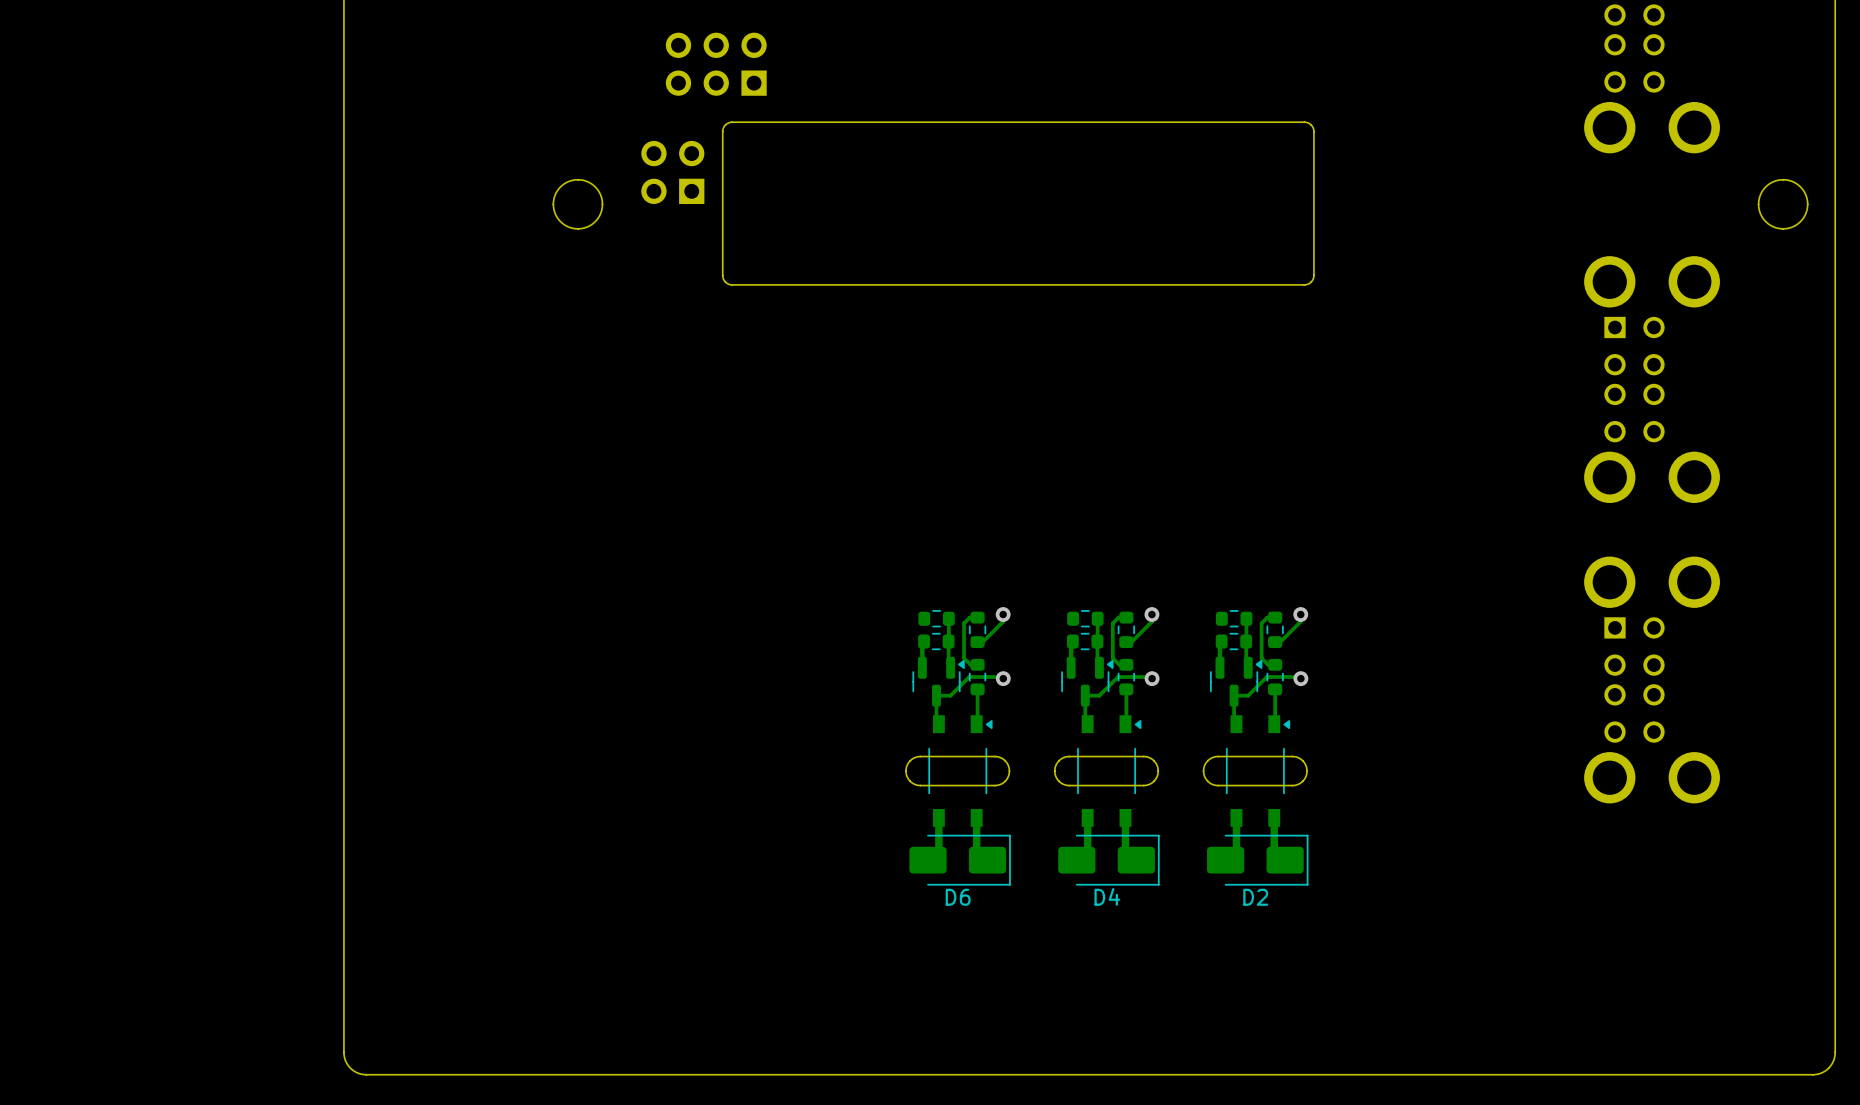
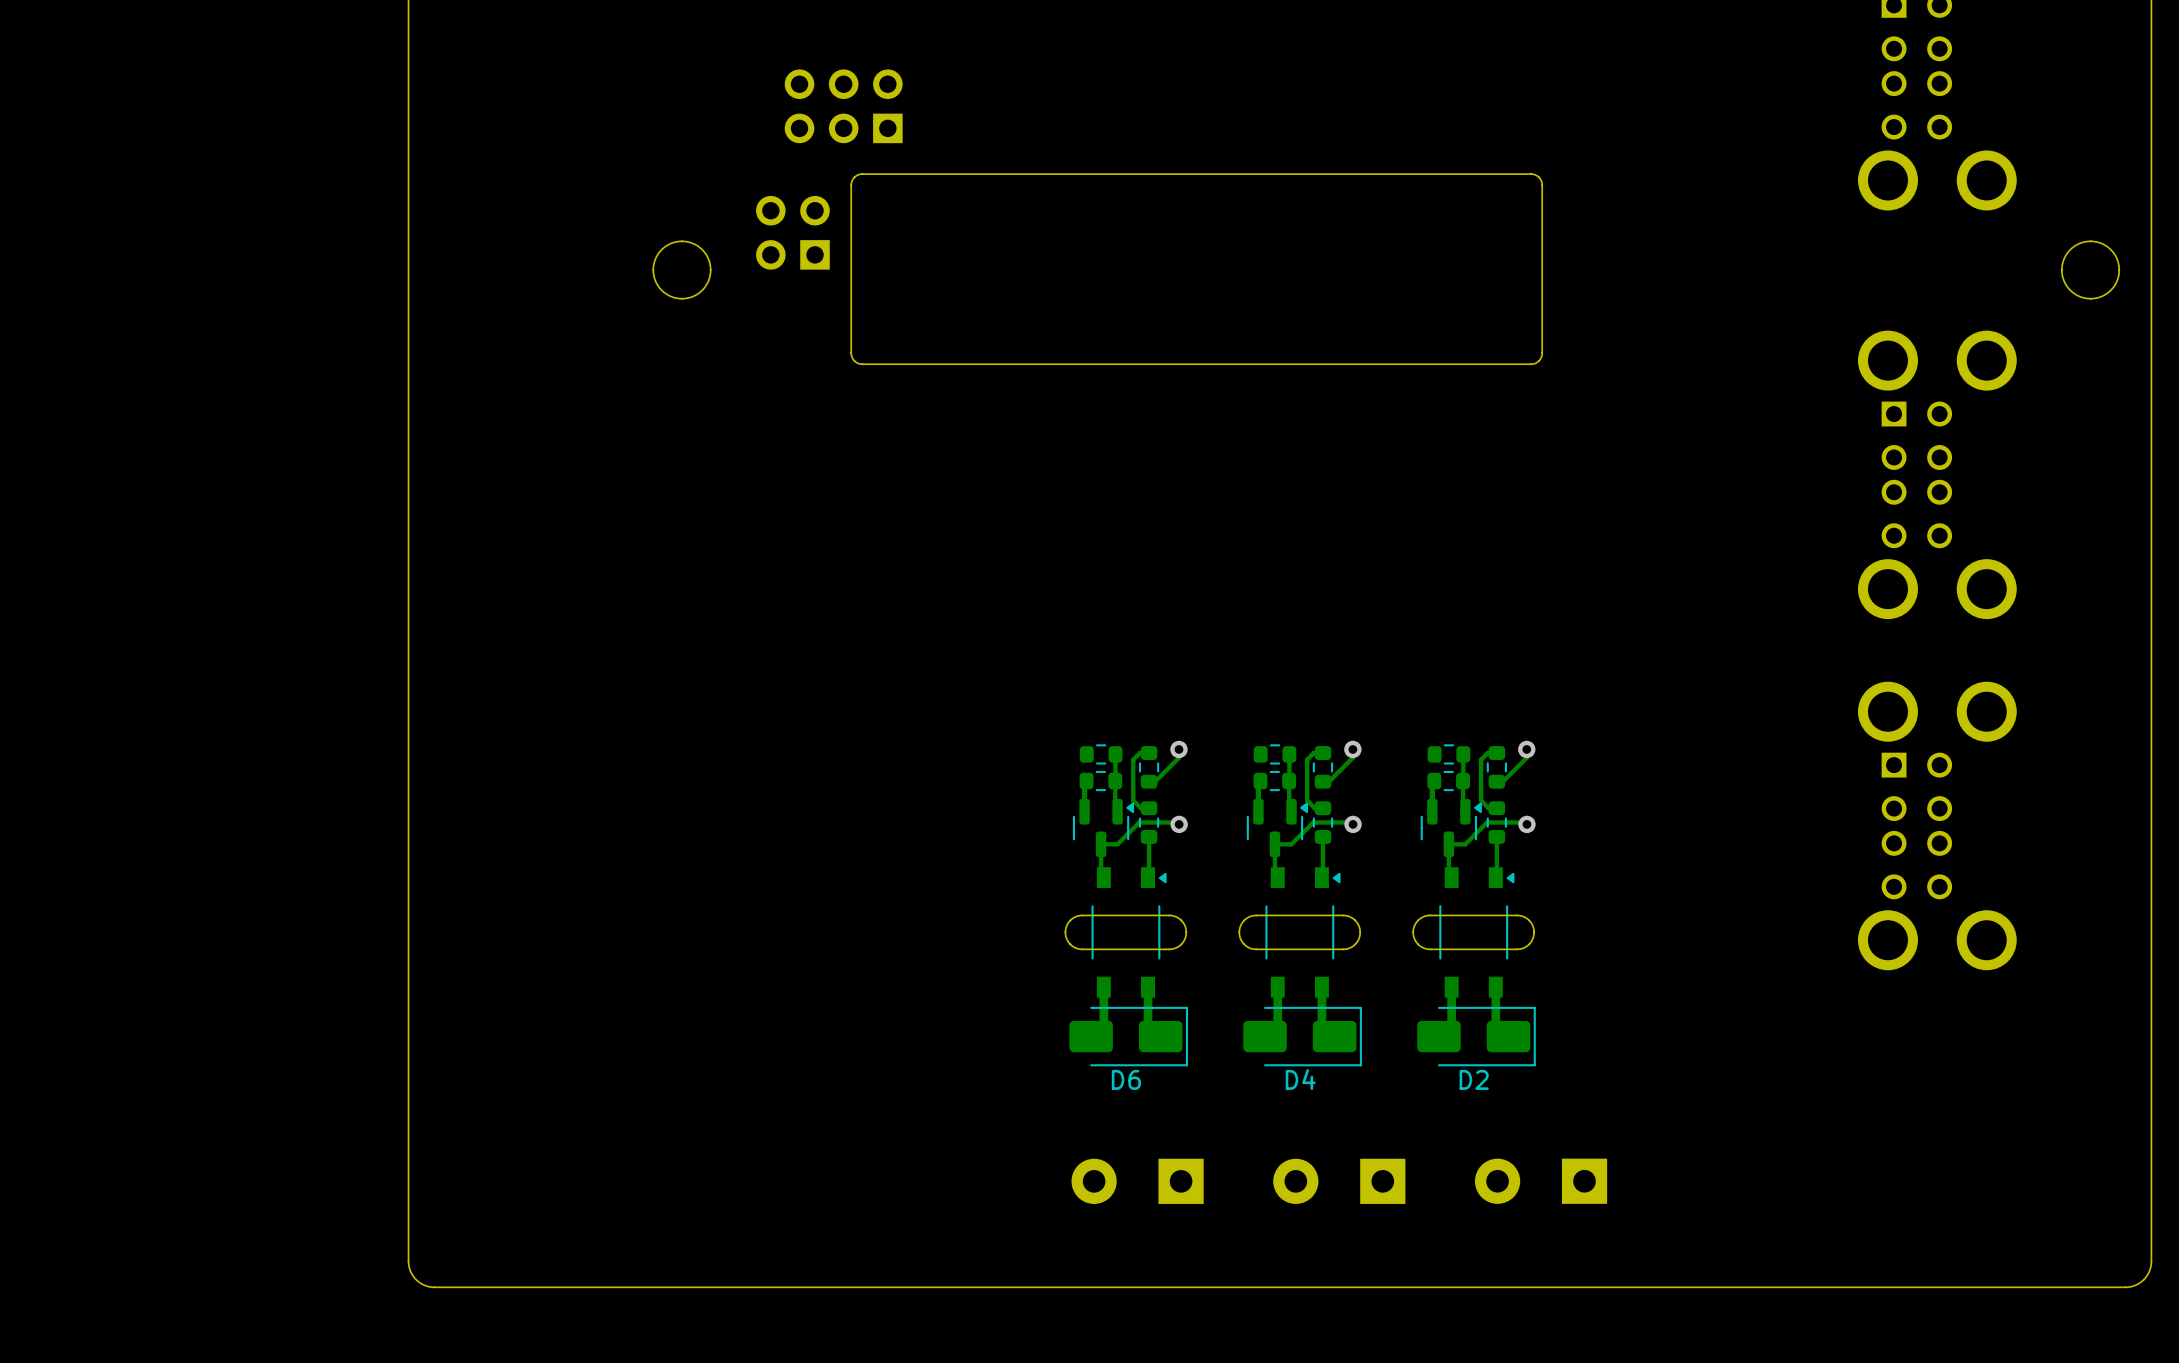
part: none -> (1541, 1181)
part: none -> (1137, 1181)
part: none -> (1339, 1181)

